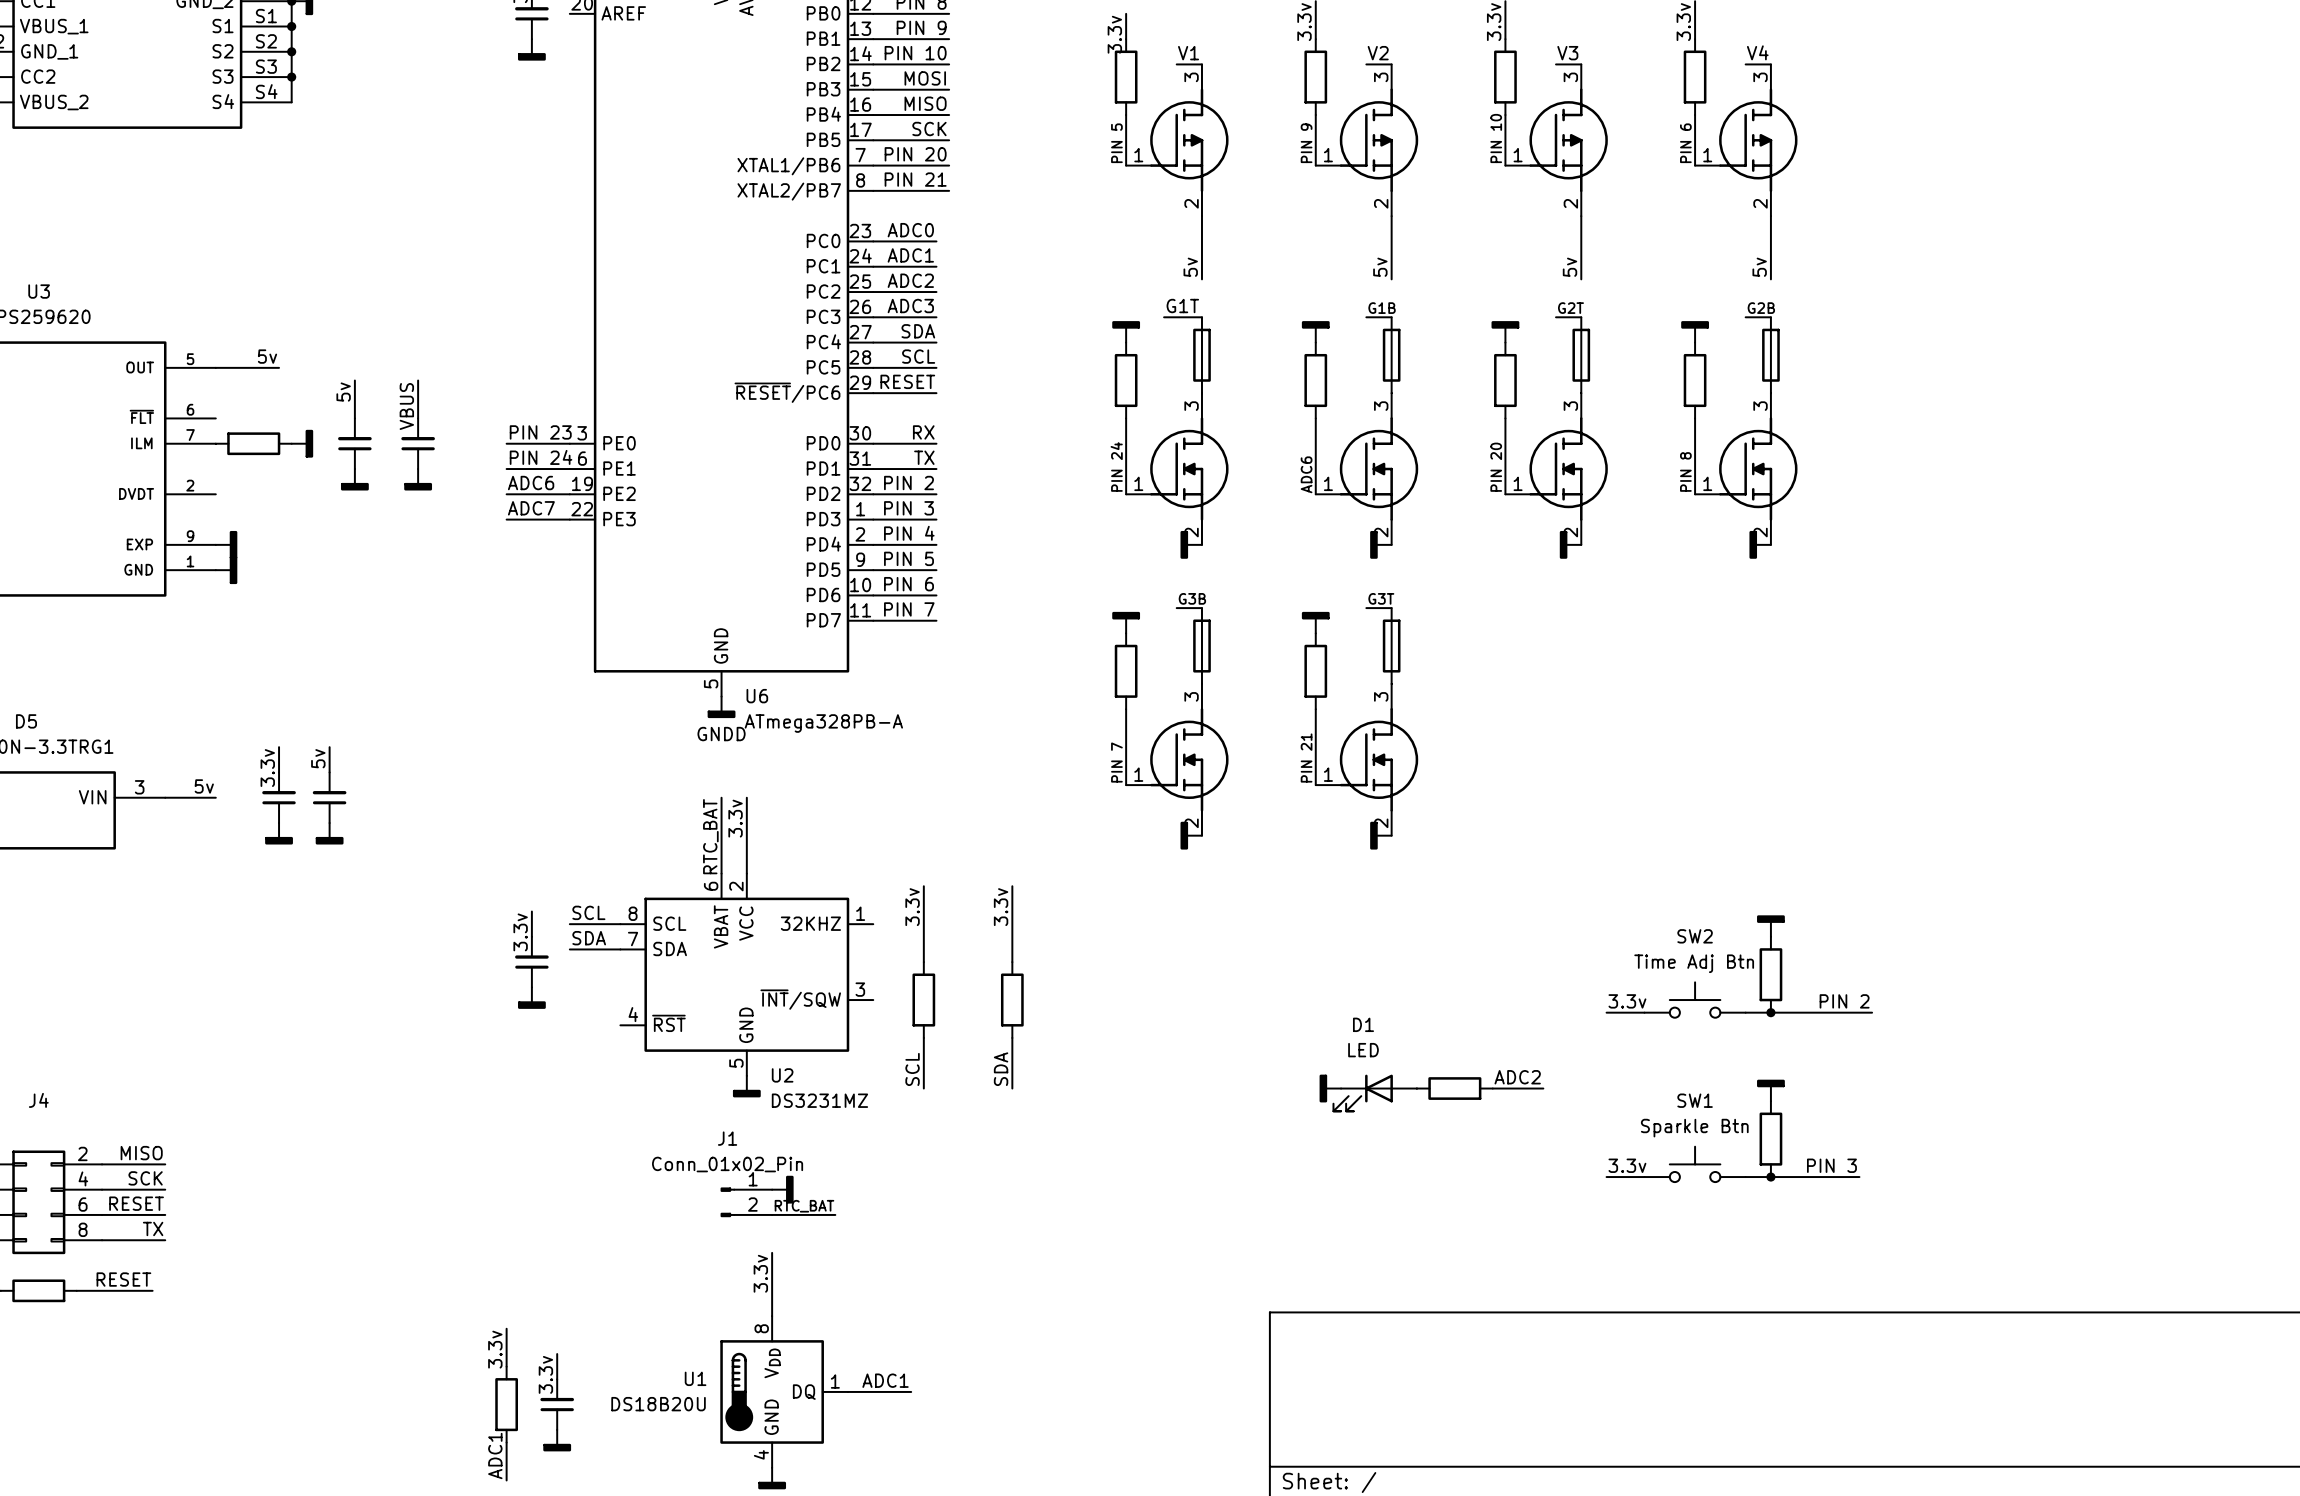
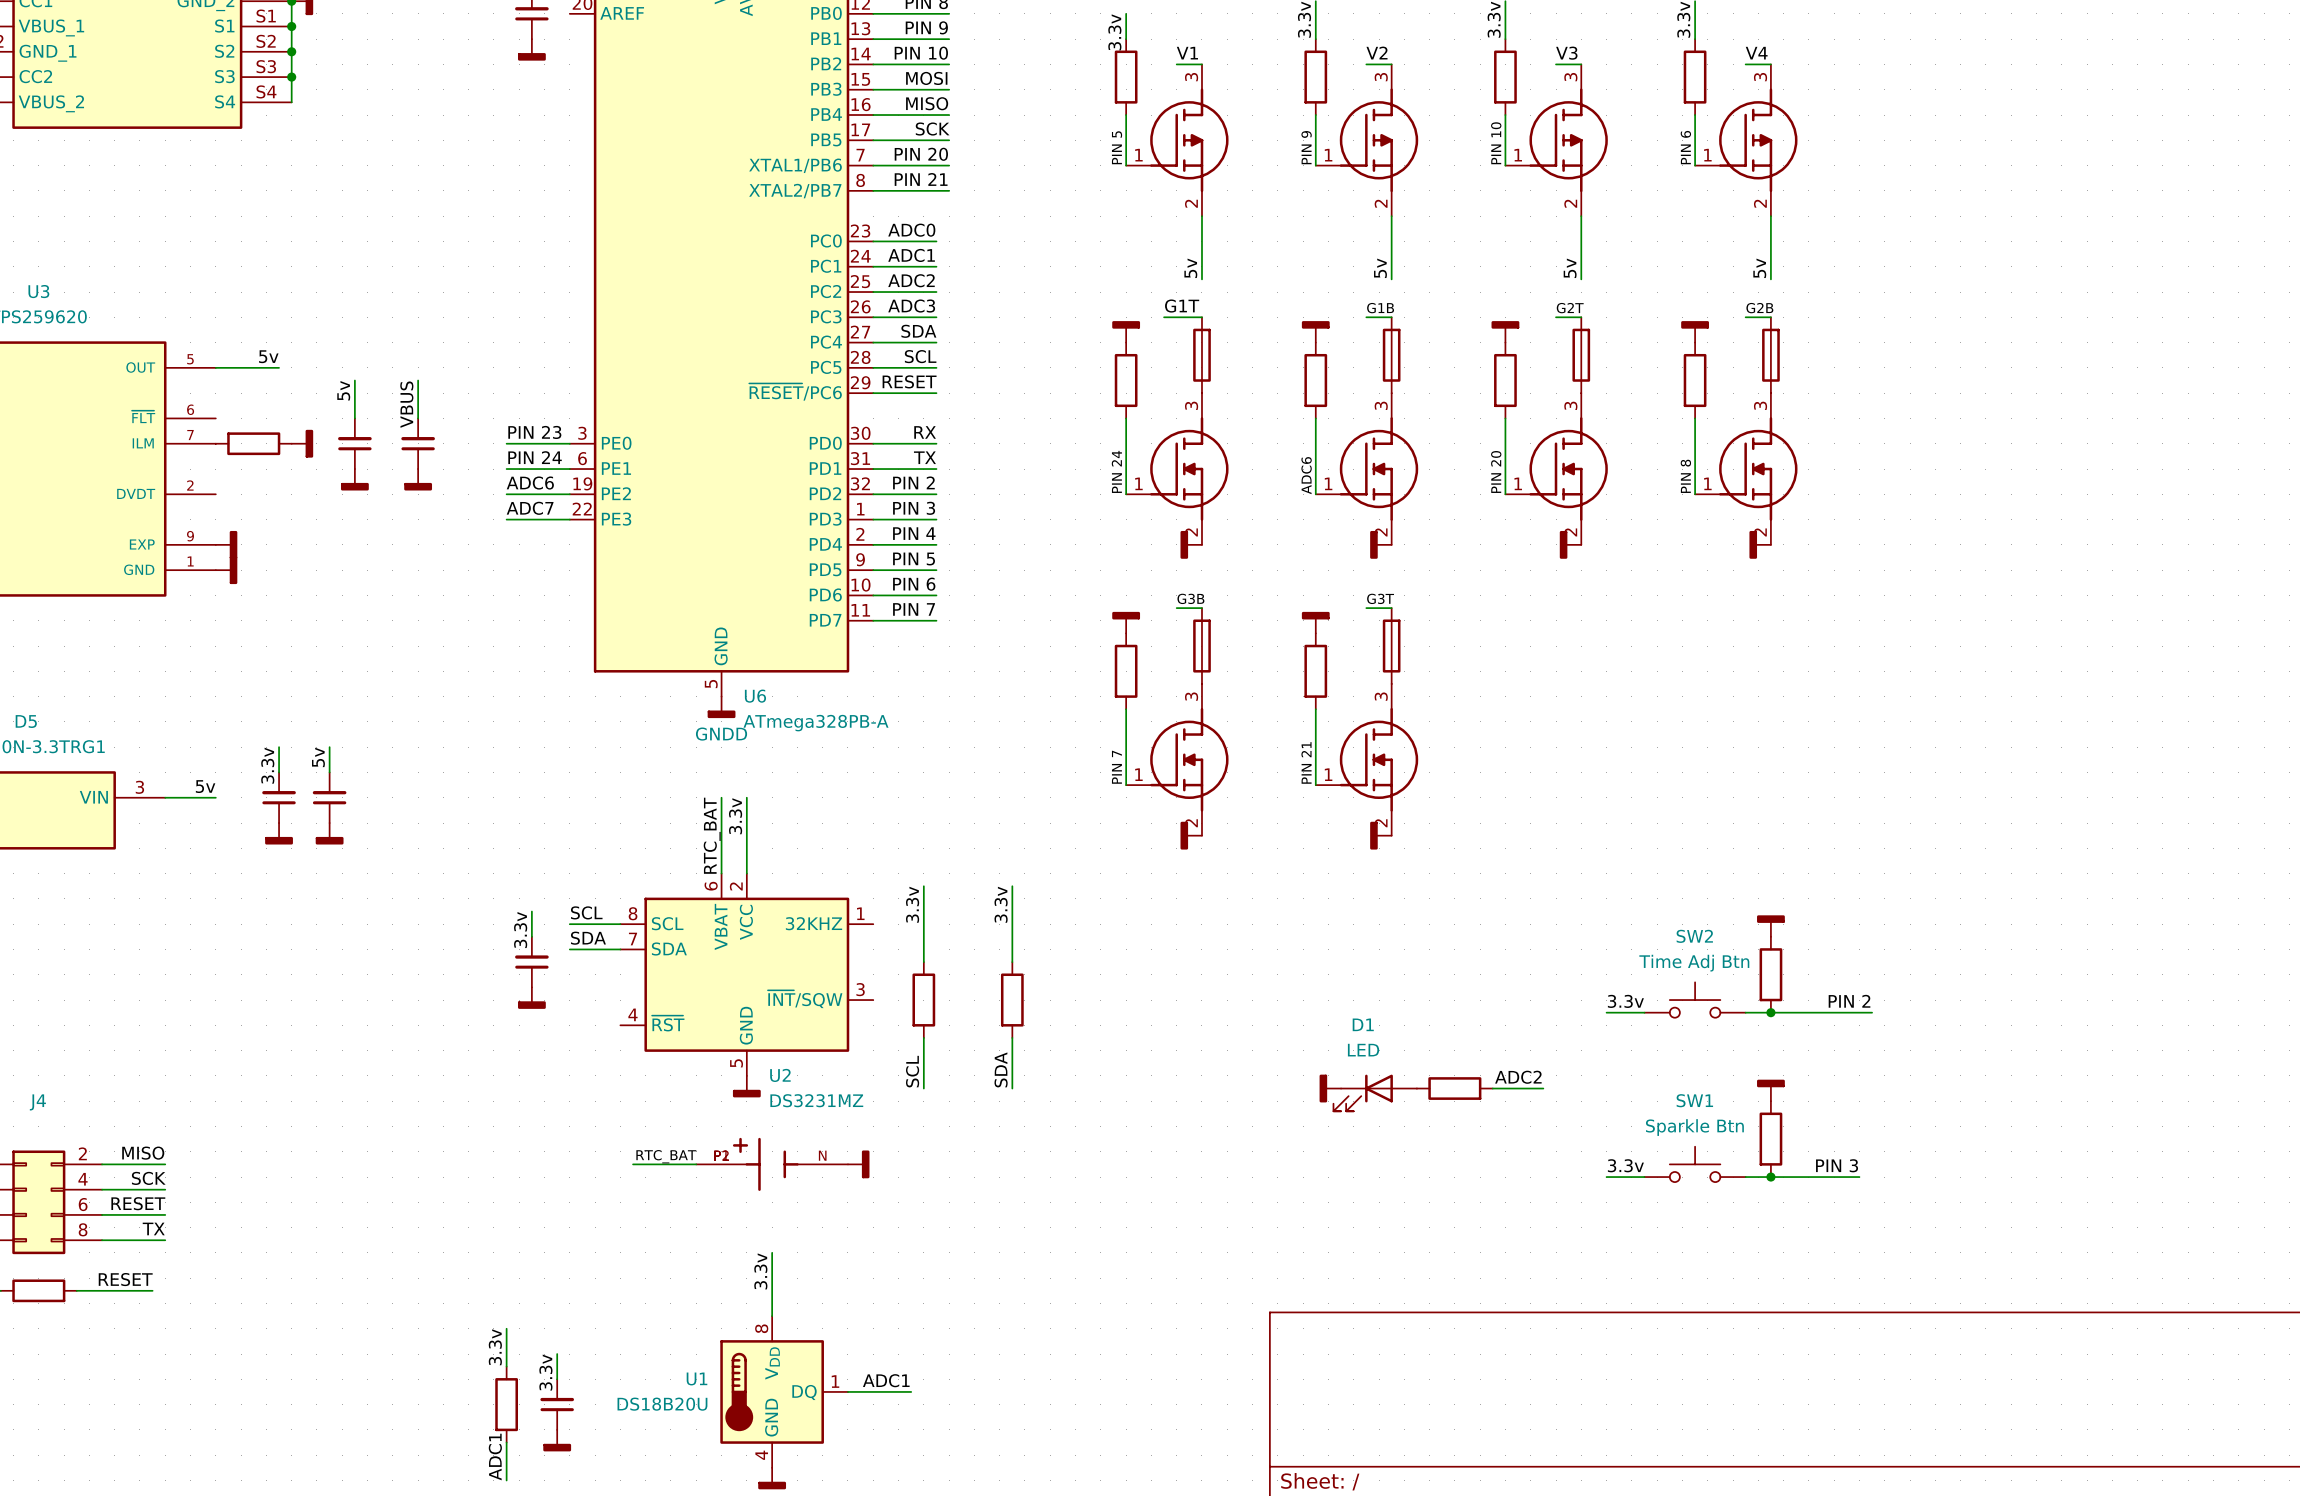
part: none -> (772, 1164)
power symbol position: (782, 1189) -> (858, 1164)
J1: Conn_01x02_Pin (746, 1202) -> none
label position: RTC_BAT (804, 1206) -> RTC_BAT (666, 1156)
wire: (772, 1214) (835, 1214) -> (633, 1164) (696, 1164)

